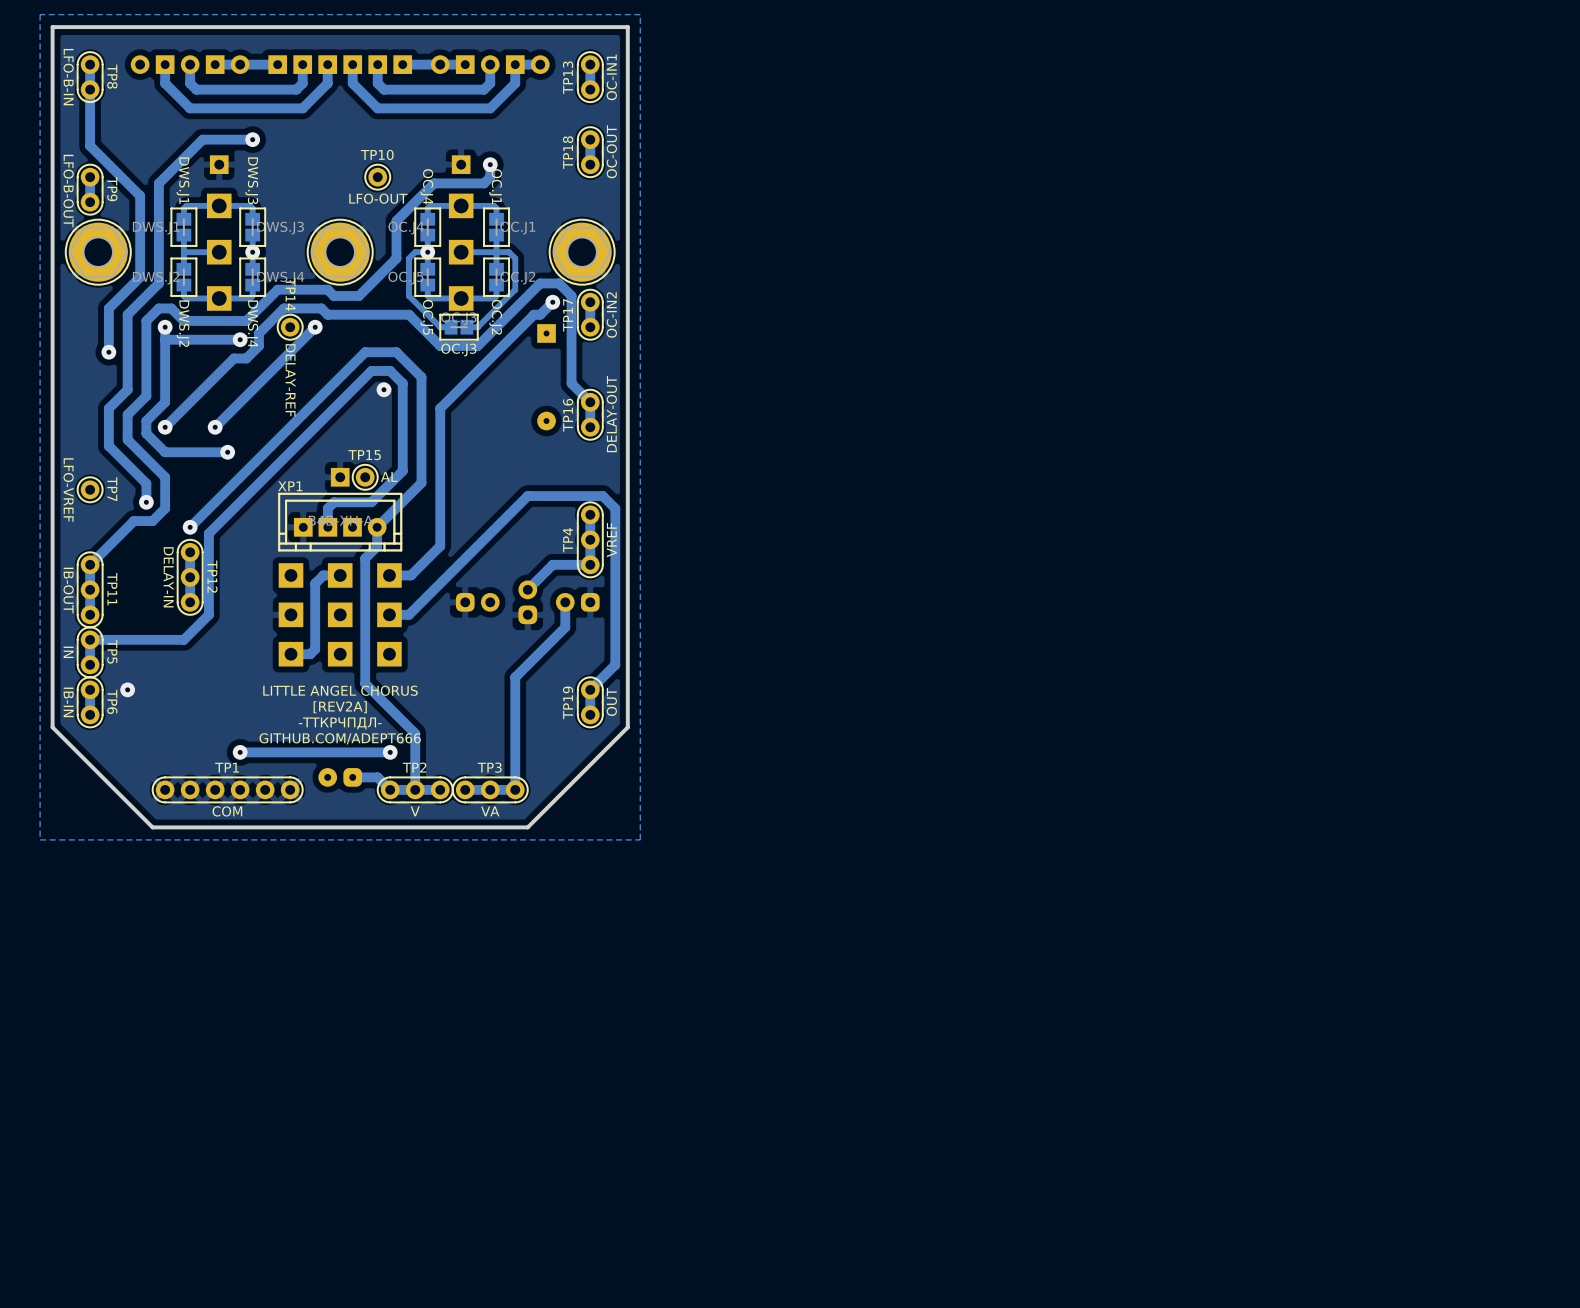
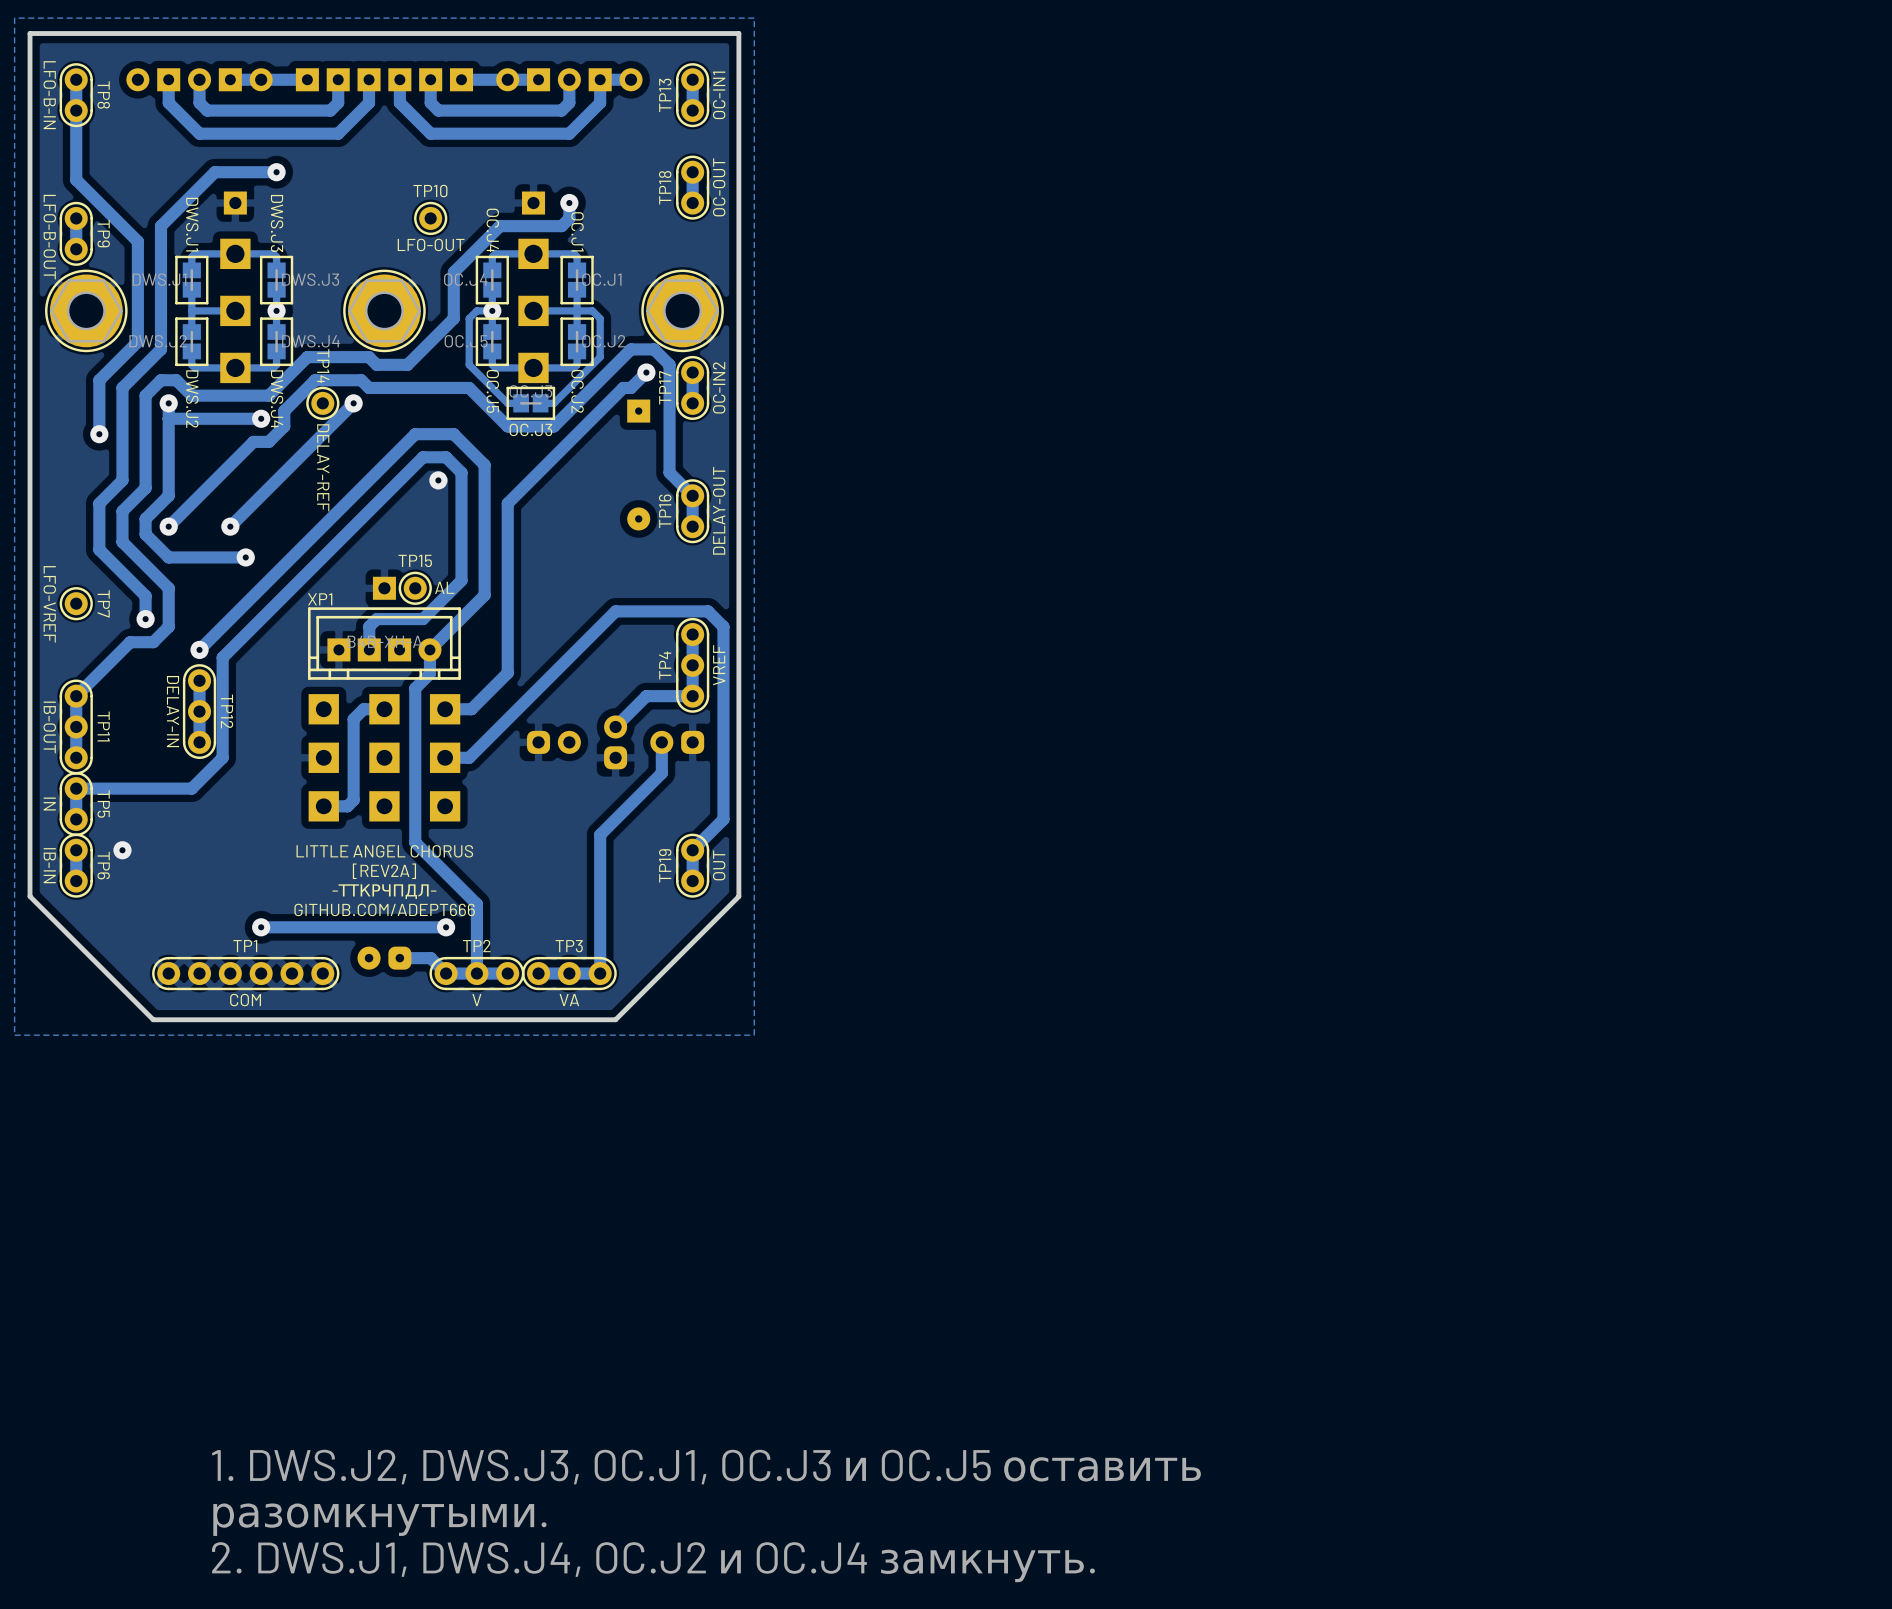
text: none -> 1. DWS.J2, DWS.J3, OC.J1, OC.J3 и OC.J5 оставить (706, 1467)
text: none -> разомкнутыми. (379, 1519)
text: none -> 2. DWS.J1, DWS.J4, OC.J2 и OC.J4 замкнуть. (653, 1562)

